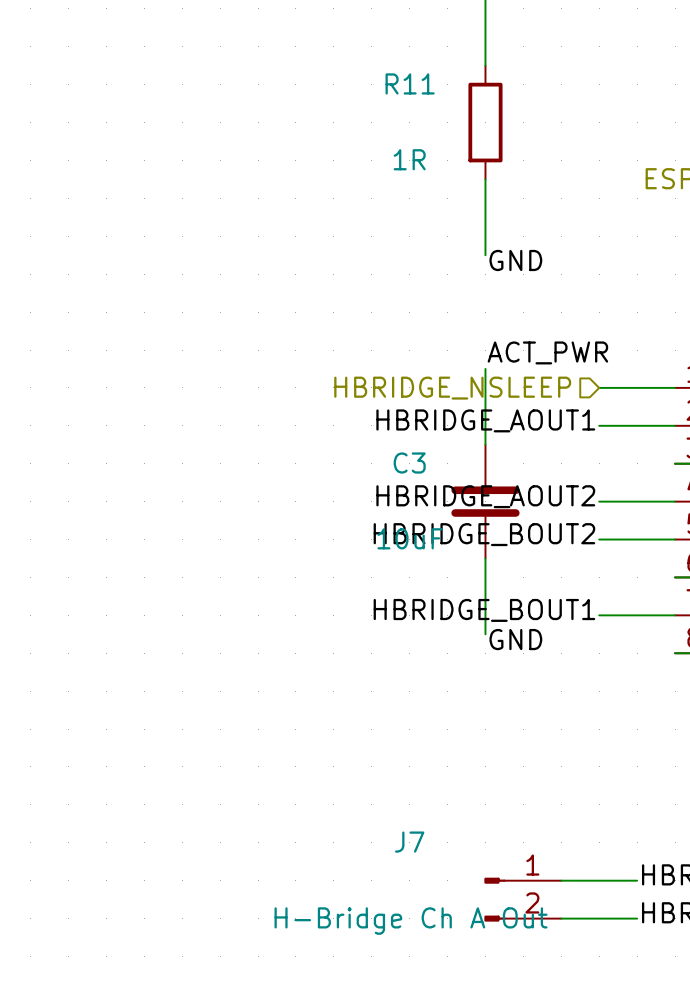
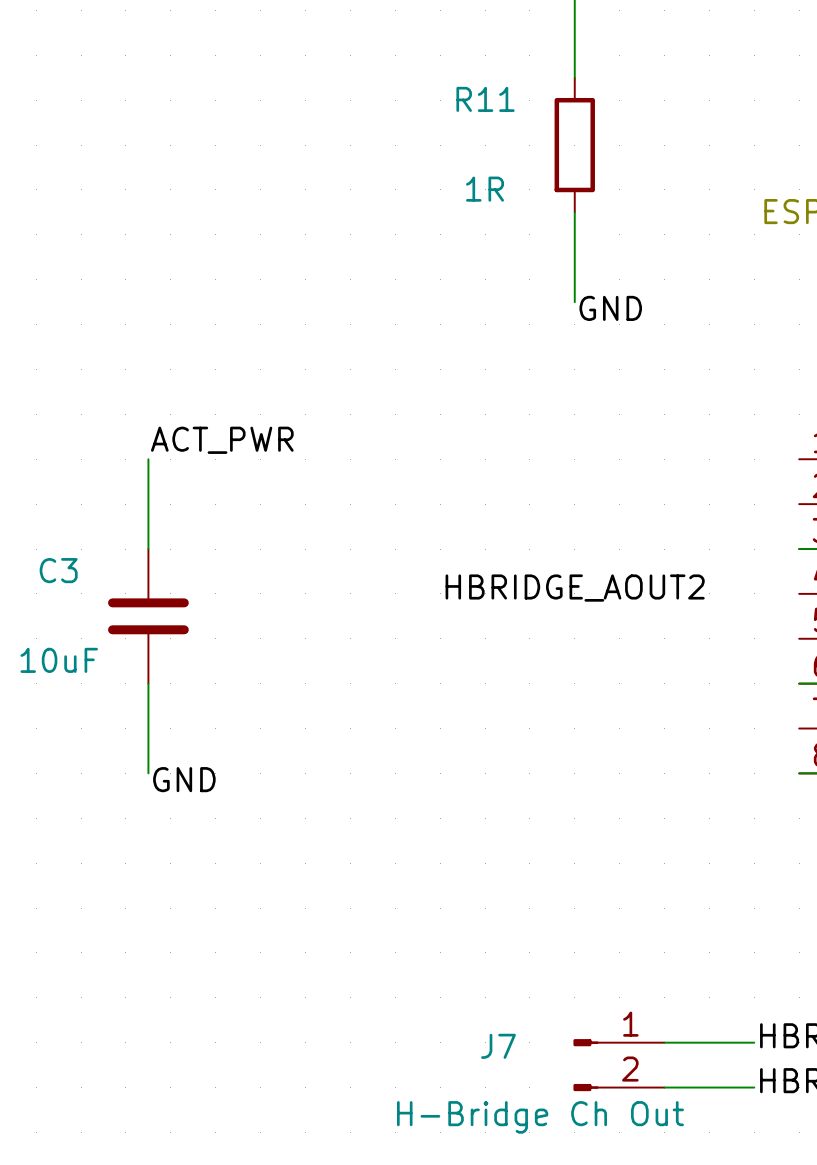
label position: ACT_PWR (547, 352) -> ACT_PWR (222, 440)
wire: (485, 368) (485, 444) -> (148, 459) (148, 549)
wire: (599, 387) (675, 387) -> none
hierarchical label: HBRIDGE_NSLEEP (452, 388) -> none
label: HBRIDGE_AOUT1 (485, 420) -> none
wire: (599, 425) (675, 425) -> none
C3 position: (485, 501) -> (148, 616)
wire: (599, 501) (675, 501) -> none
label: HBRIDGE_BOUT2 (484, 534) -> none
wire: (599, 539) (675, 539) -> none
wire: (485, 558) (485, 634) -> (148, 683) (148, 773)
label: HBRIDGE_BOUT1 (484, 610) -> none
wire: (599, 615) (675, 615) -> none
label position: GND (515, 639) -> GND (184, 779)
J7 name position: J7 (409, 842) -> J7 (498, 1046)
J7 value: H-Bridge Ch A Out (411, 921) -> H-Bridge Ch Out (540, 1117)

